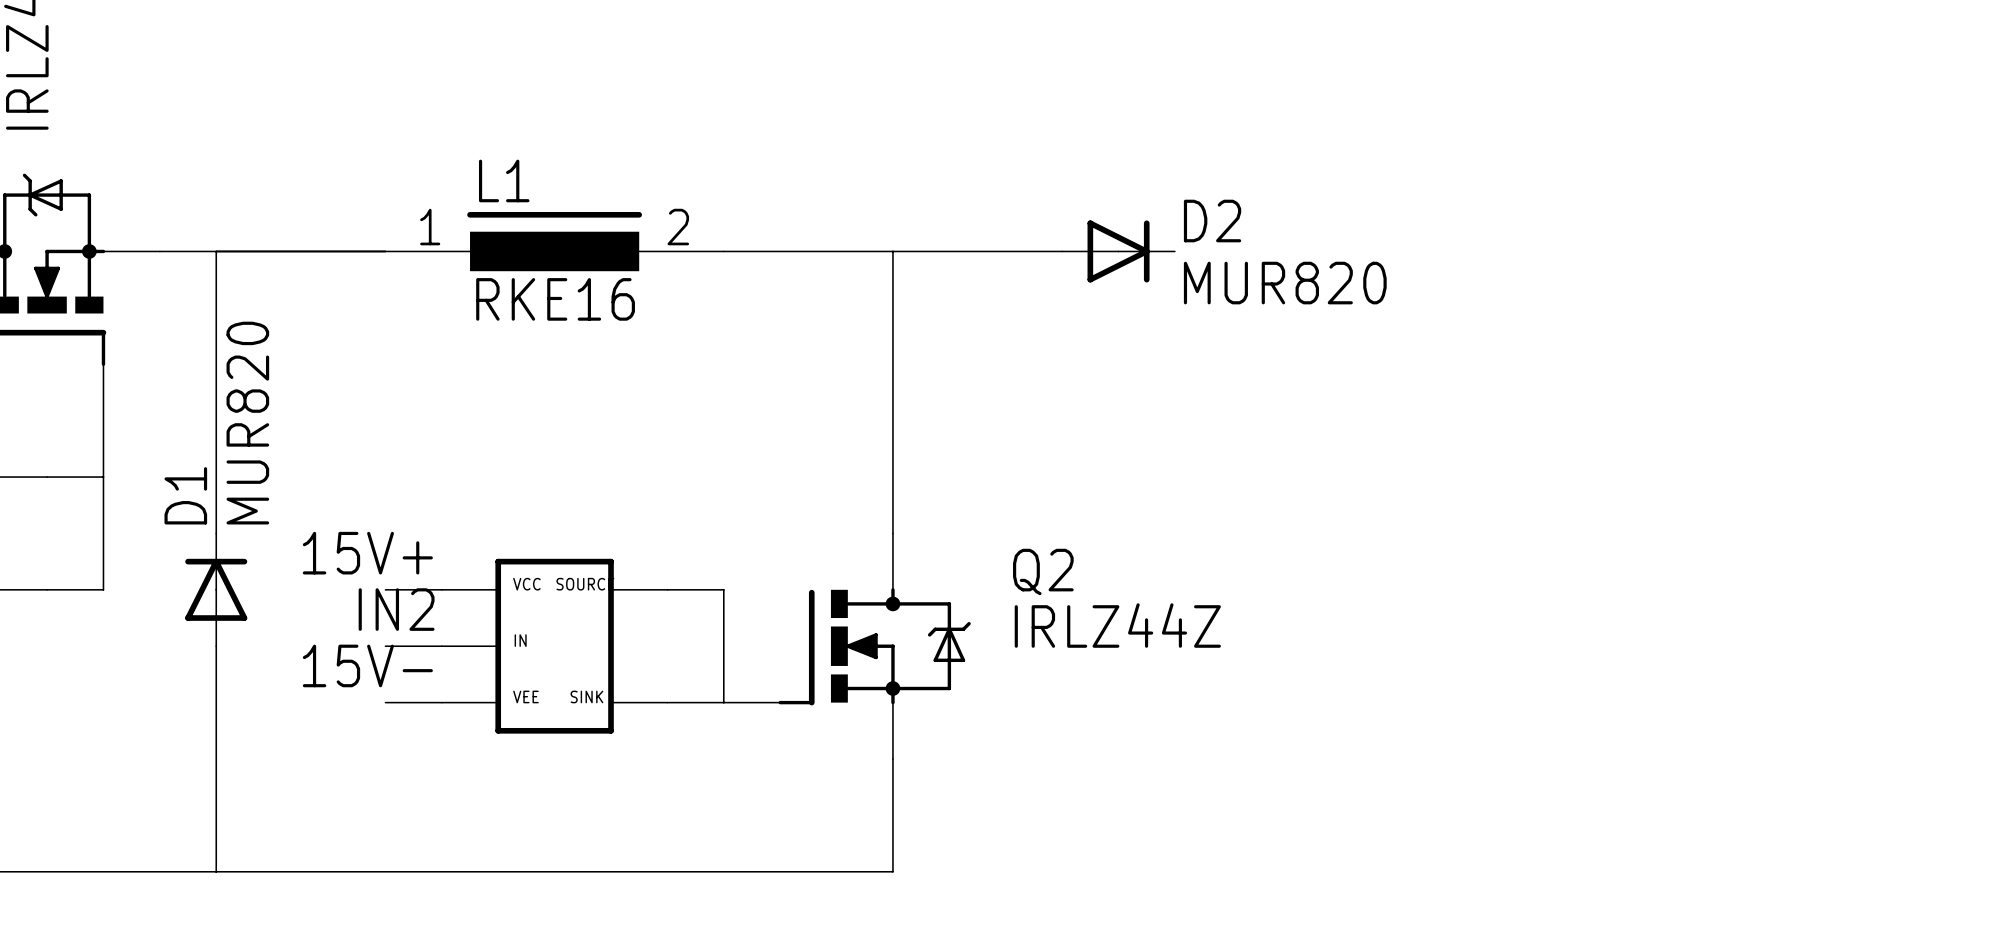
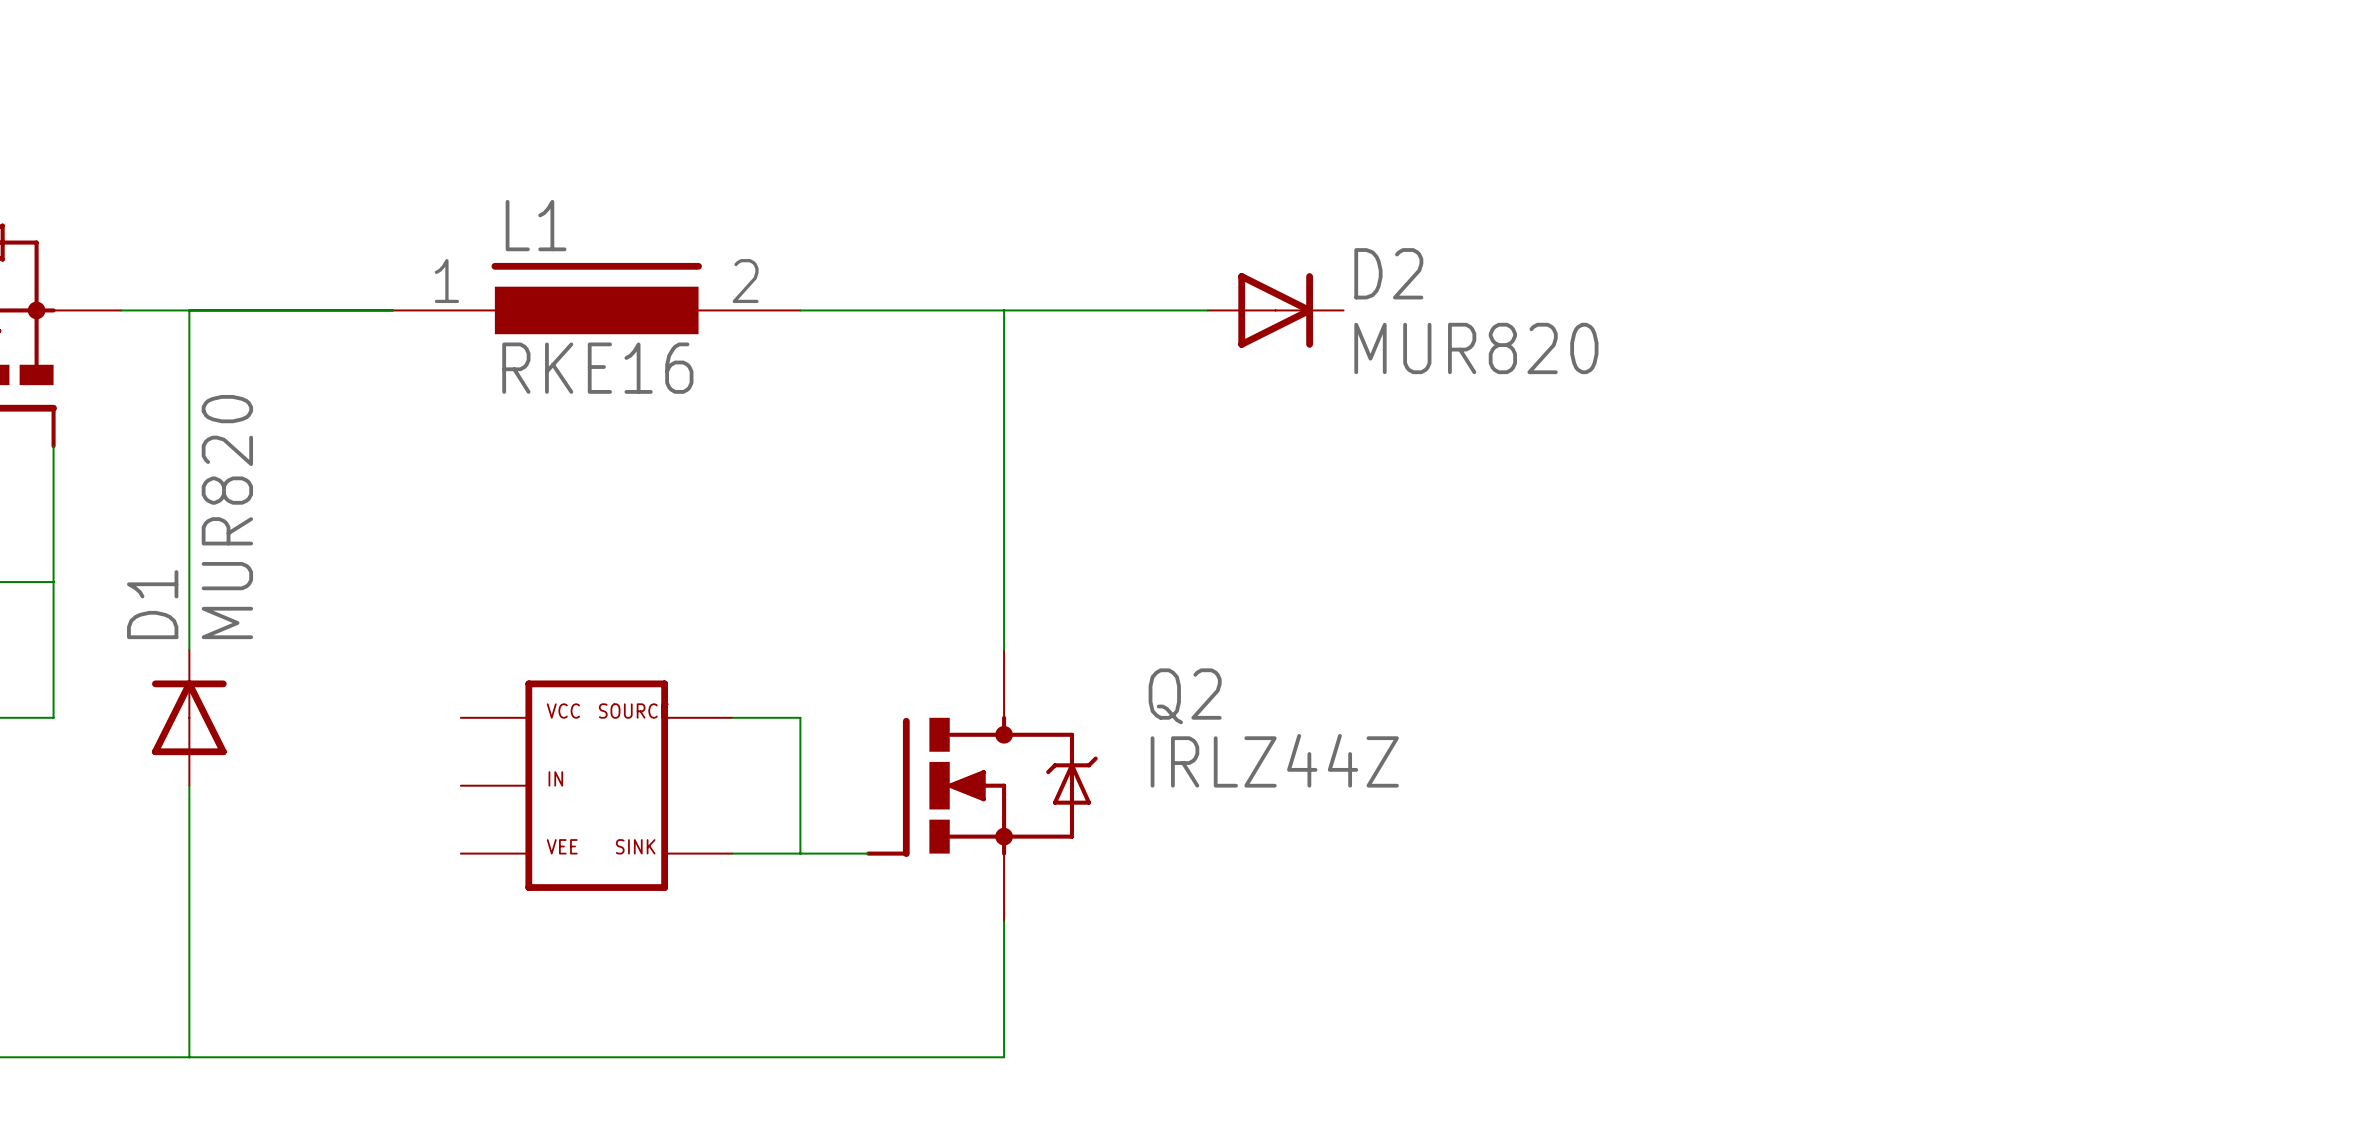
label: 15V+ (367, 553) -> none
wire: (385, 589) (441, 589) -> none
label: IN2 (396, 609) -> none
wire: (385, 646) (441, 646) -> none
label: 15V- (367, 665) -> none
wire: (385, 702) (441, 702) -> none

